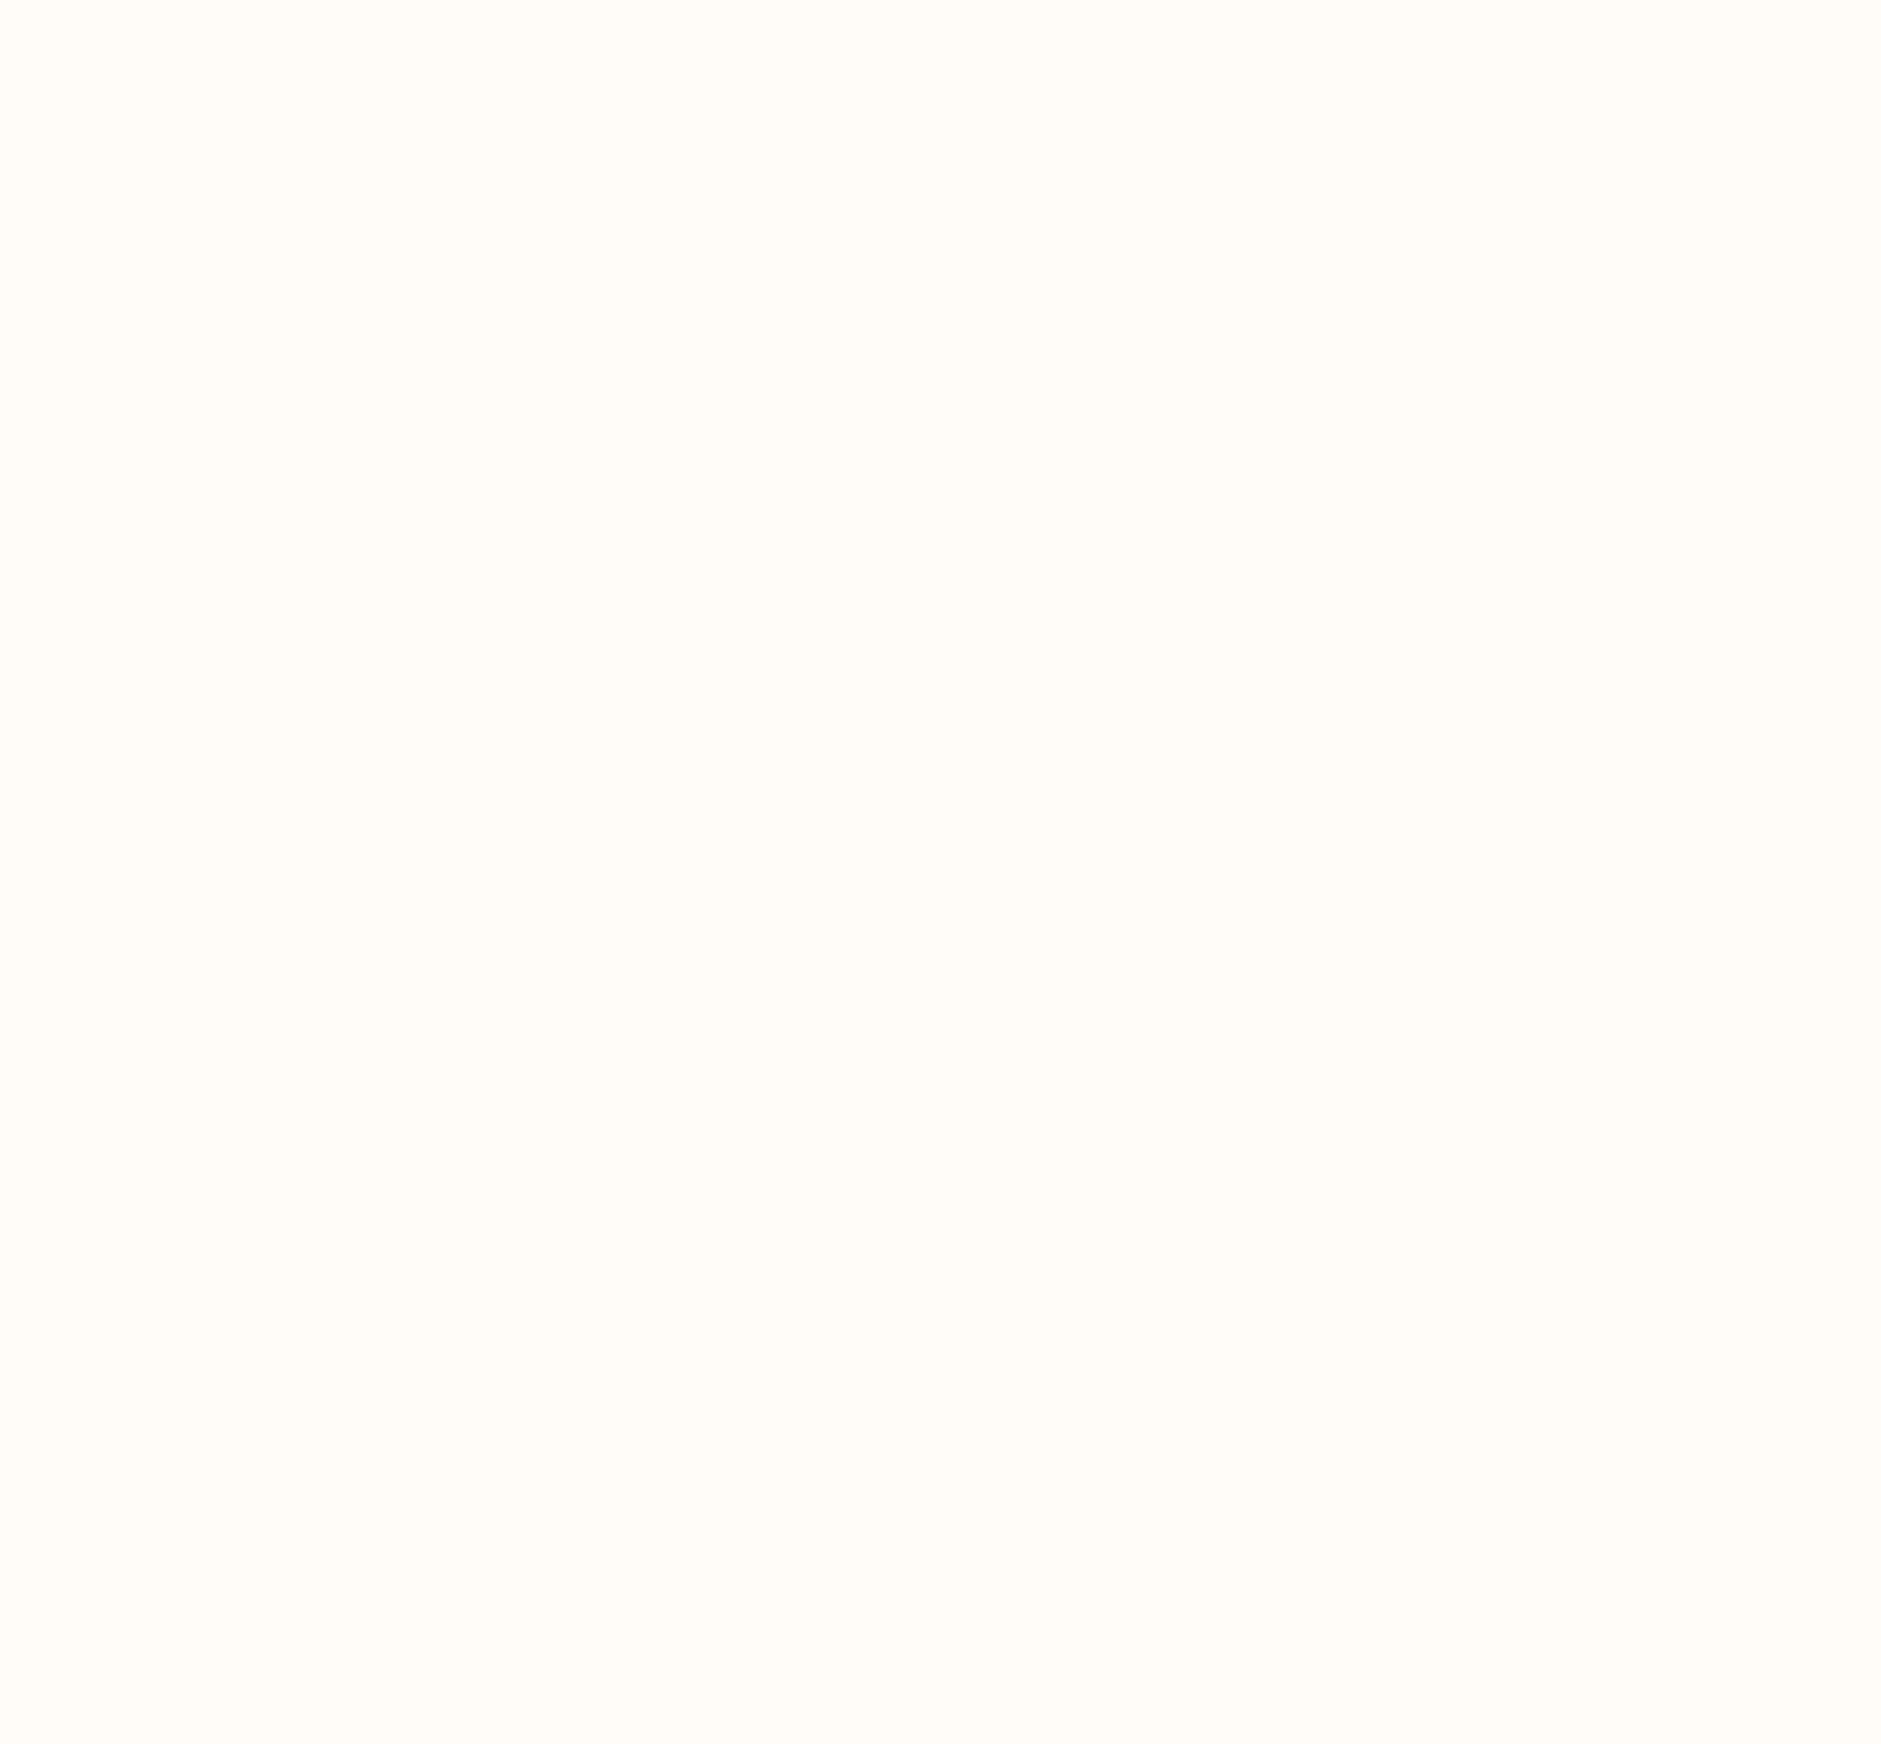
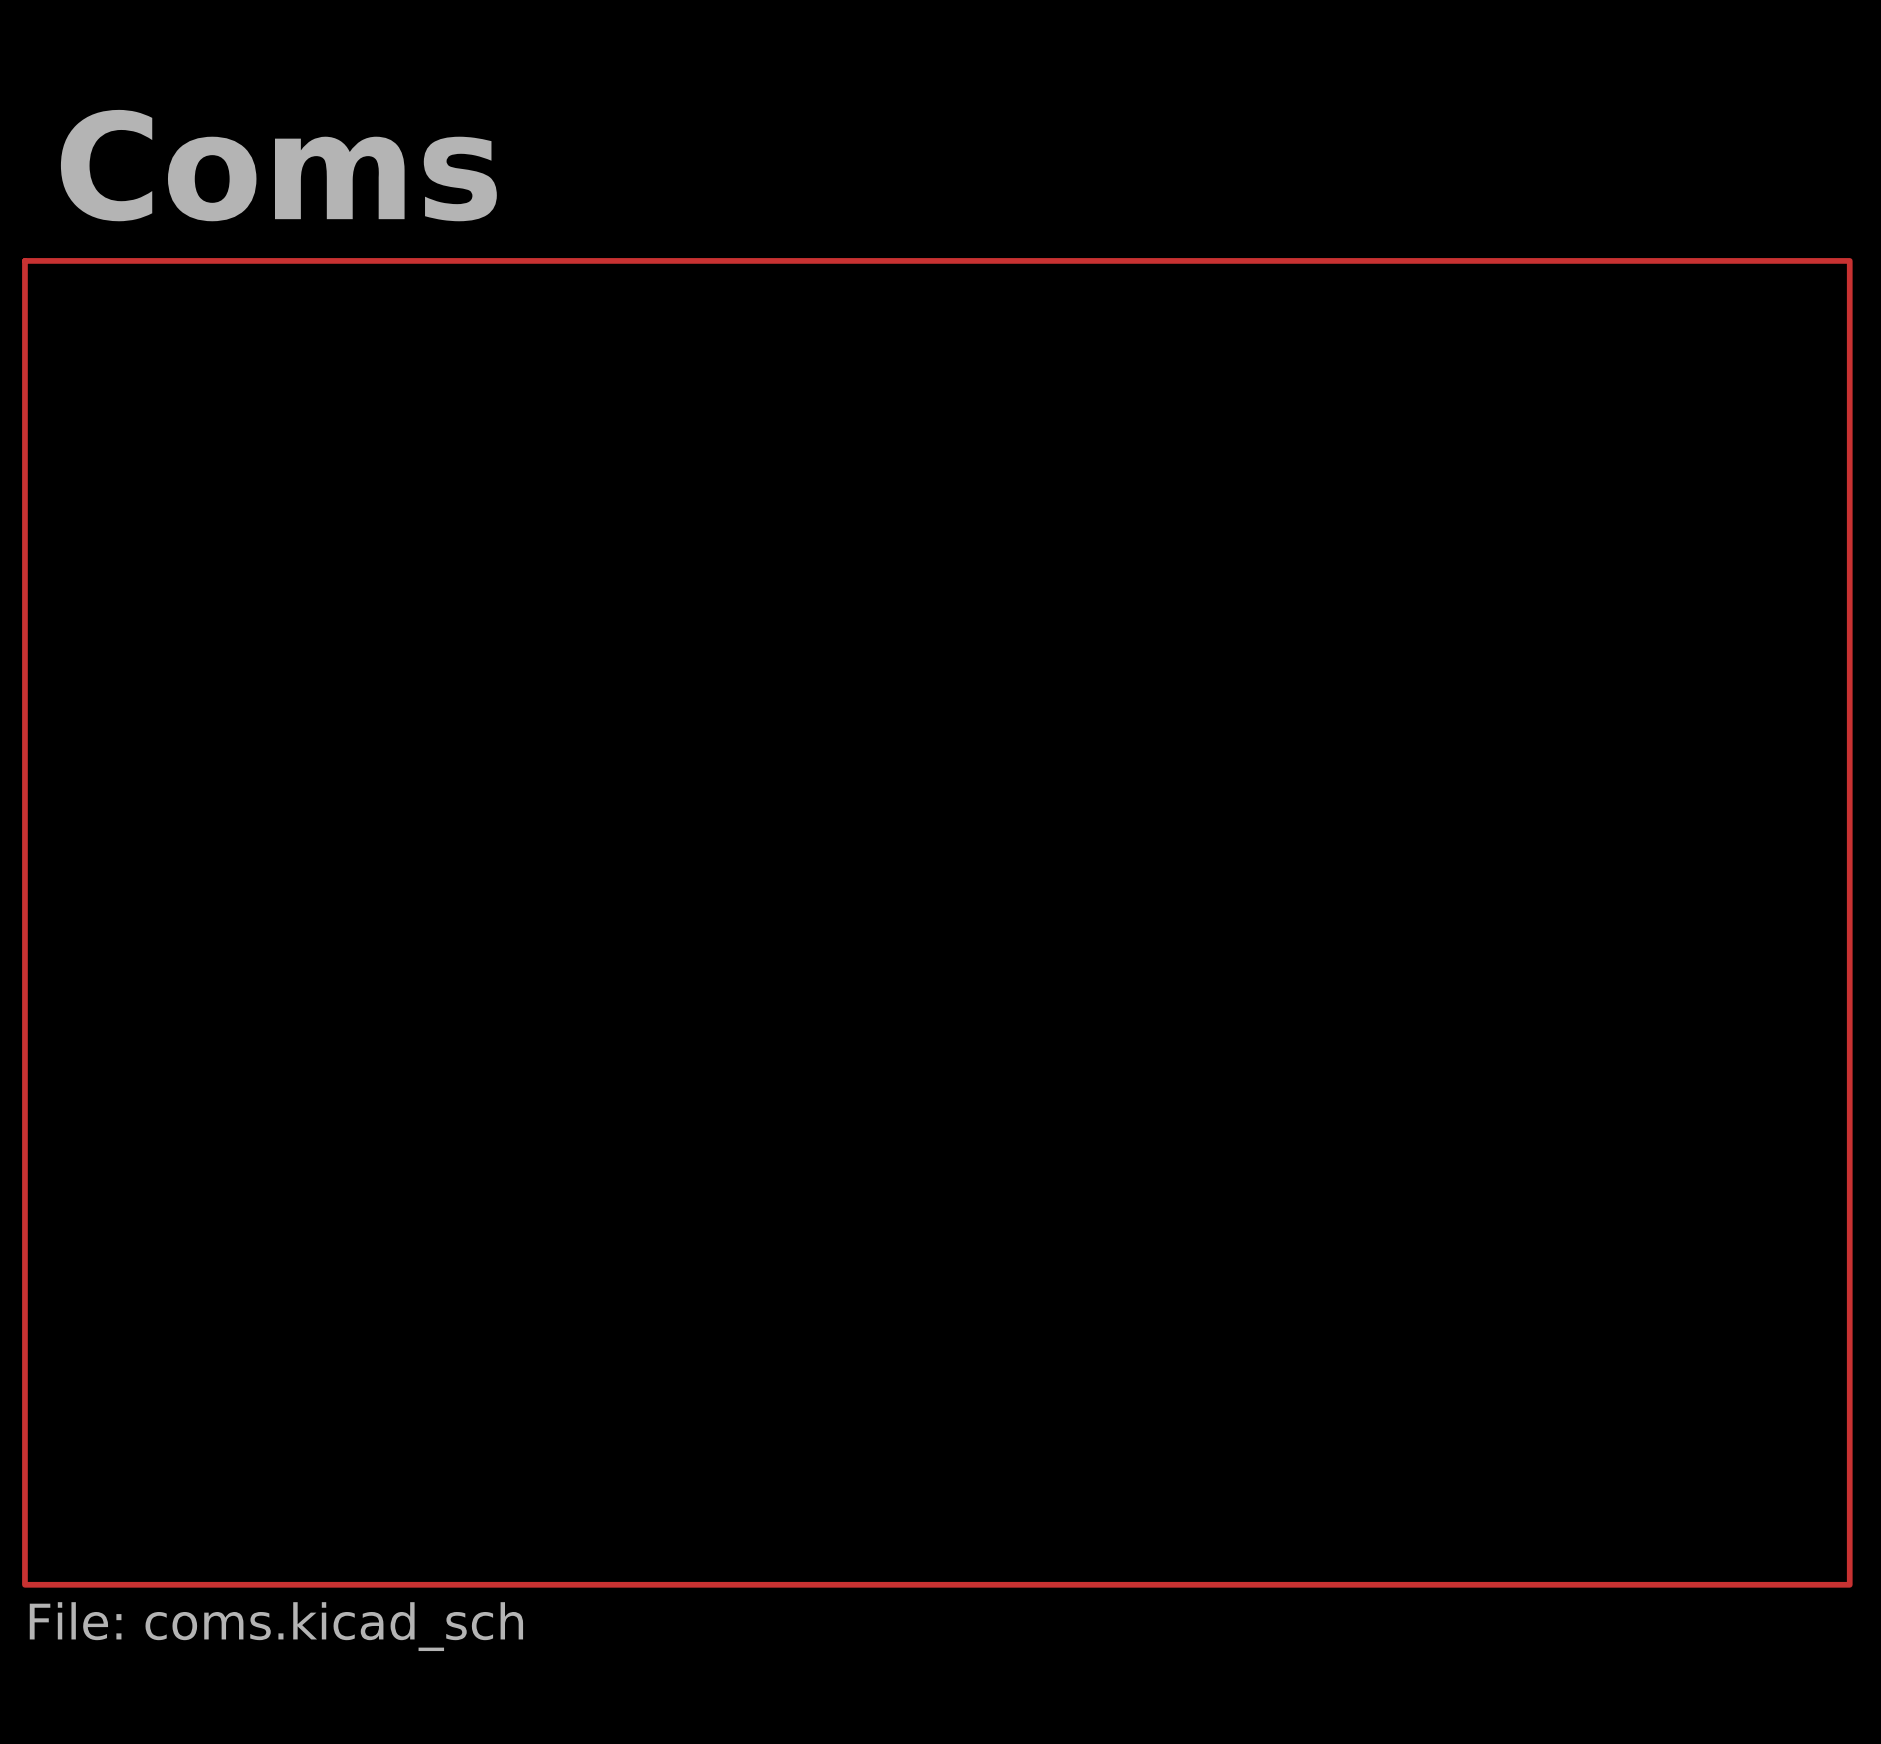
sheet Coms: none -> File: coms.kicad_sch (937, 922)

